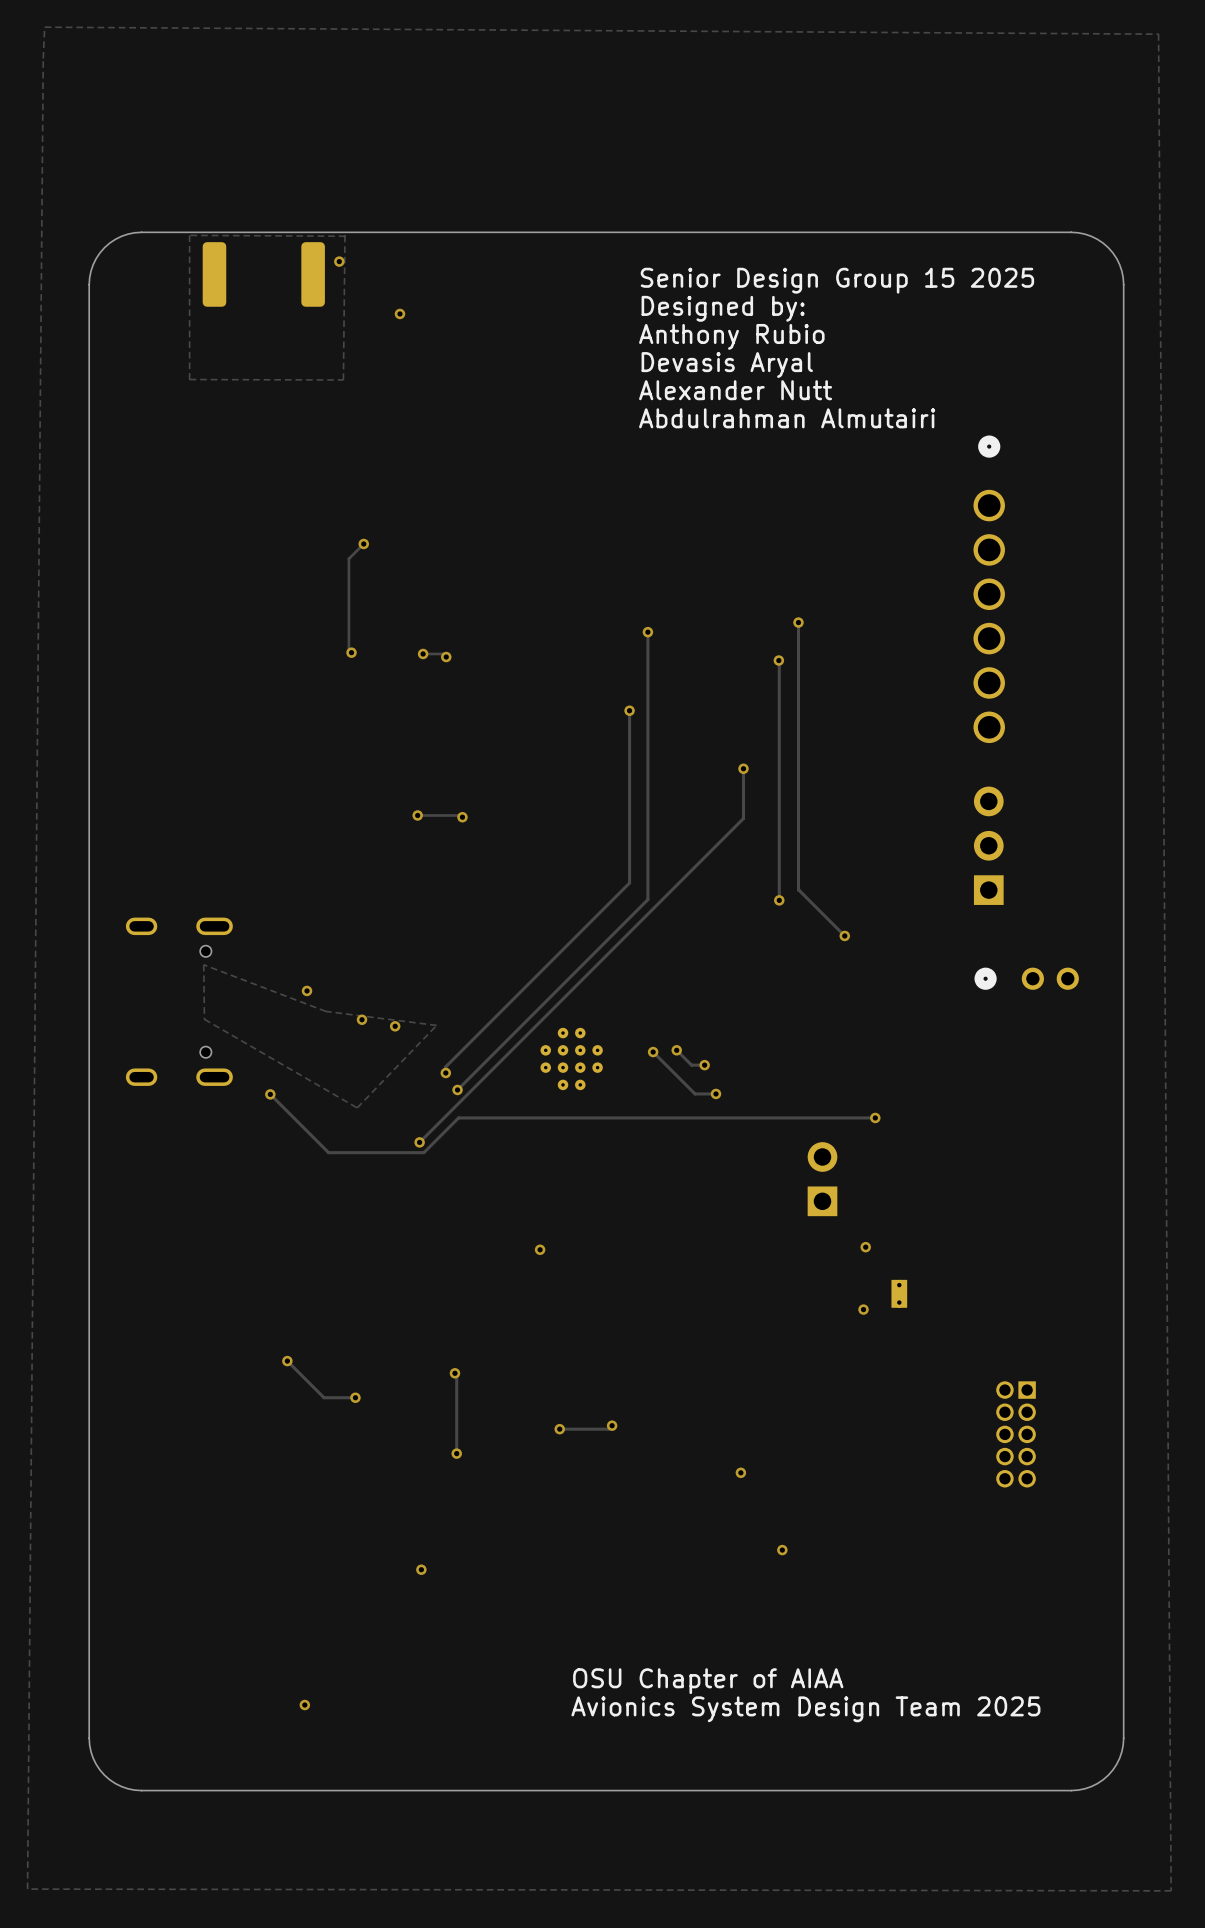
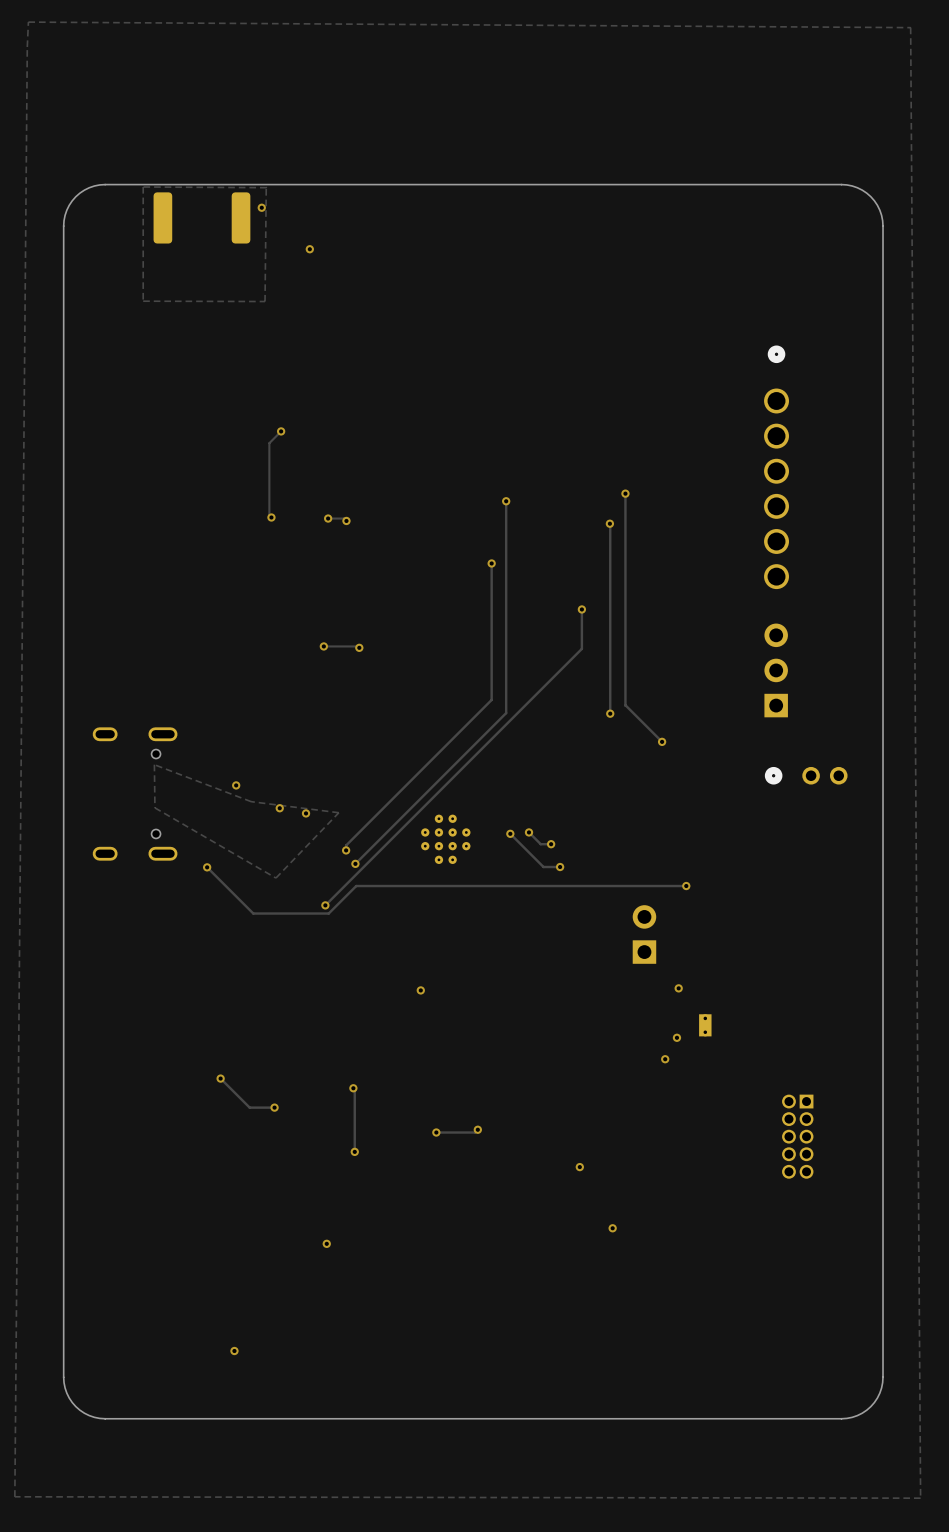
text: Senior Design Group 15 2025 (837, 280) -> none
text: Designed by: (723, 308) -> none
text: Anthony Rubio (731, 336) -> none
text: Devasis Aryal (727, 365) -> none
text: Alexander Nutt (735, 390) -> none
text: Abdulrahman Almutairi (787, 418) -> none
via: none -> (665, 1059)
text: OSU Chapter of AIAA (708, 1681) -> none
text: Avionics System Design Team 2025 (805, 1709) -> none

